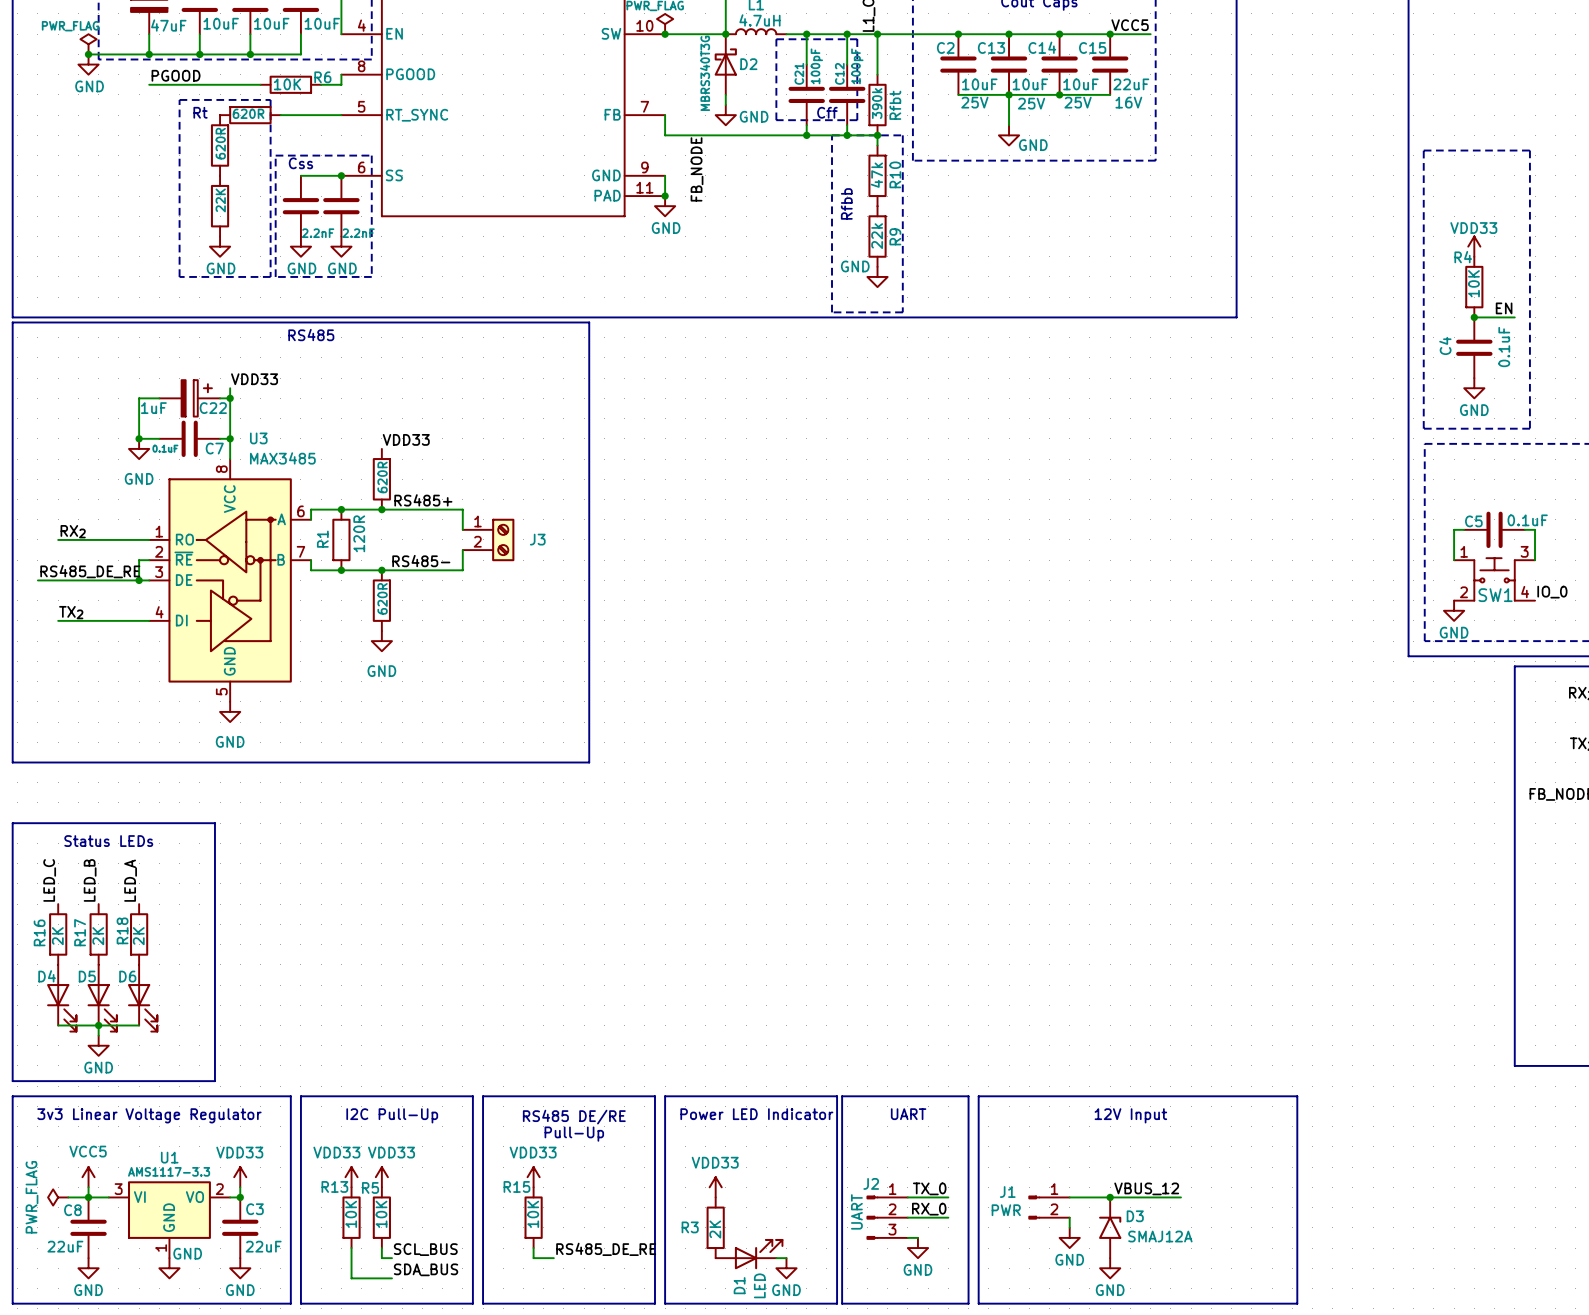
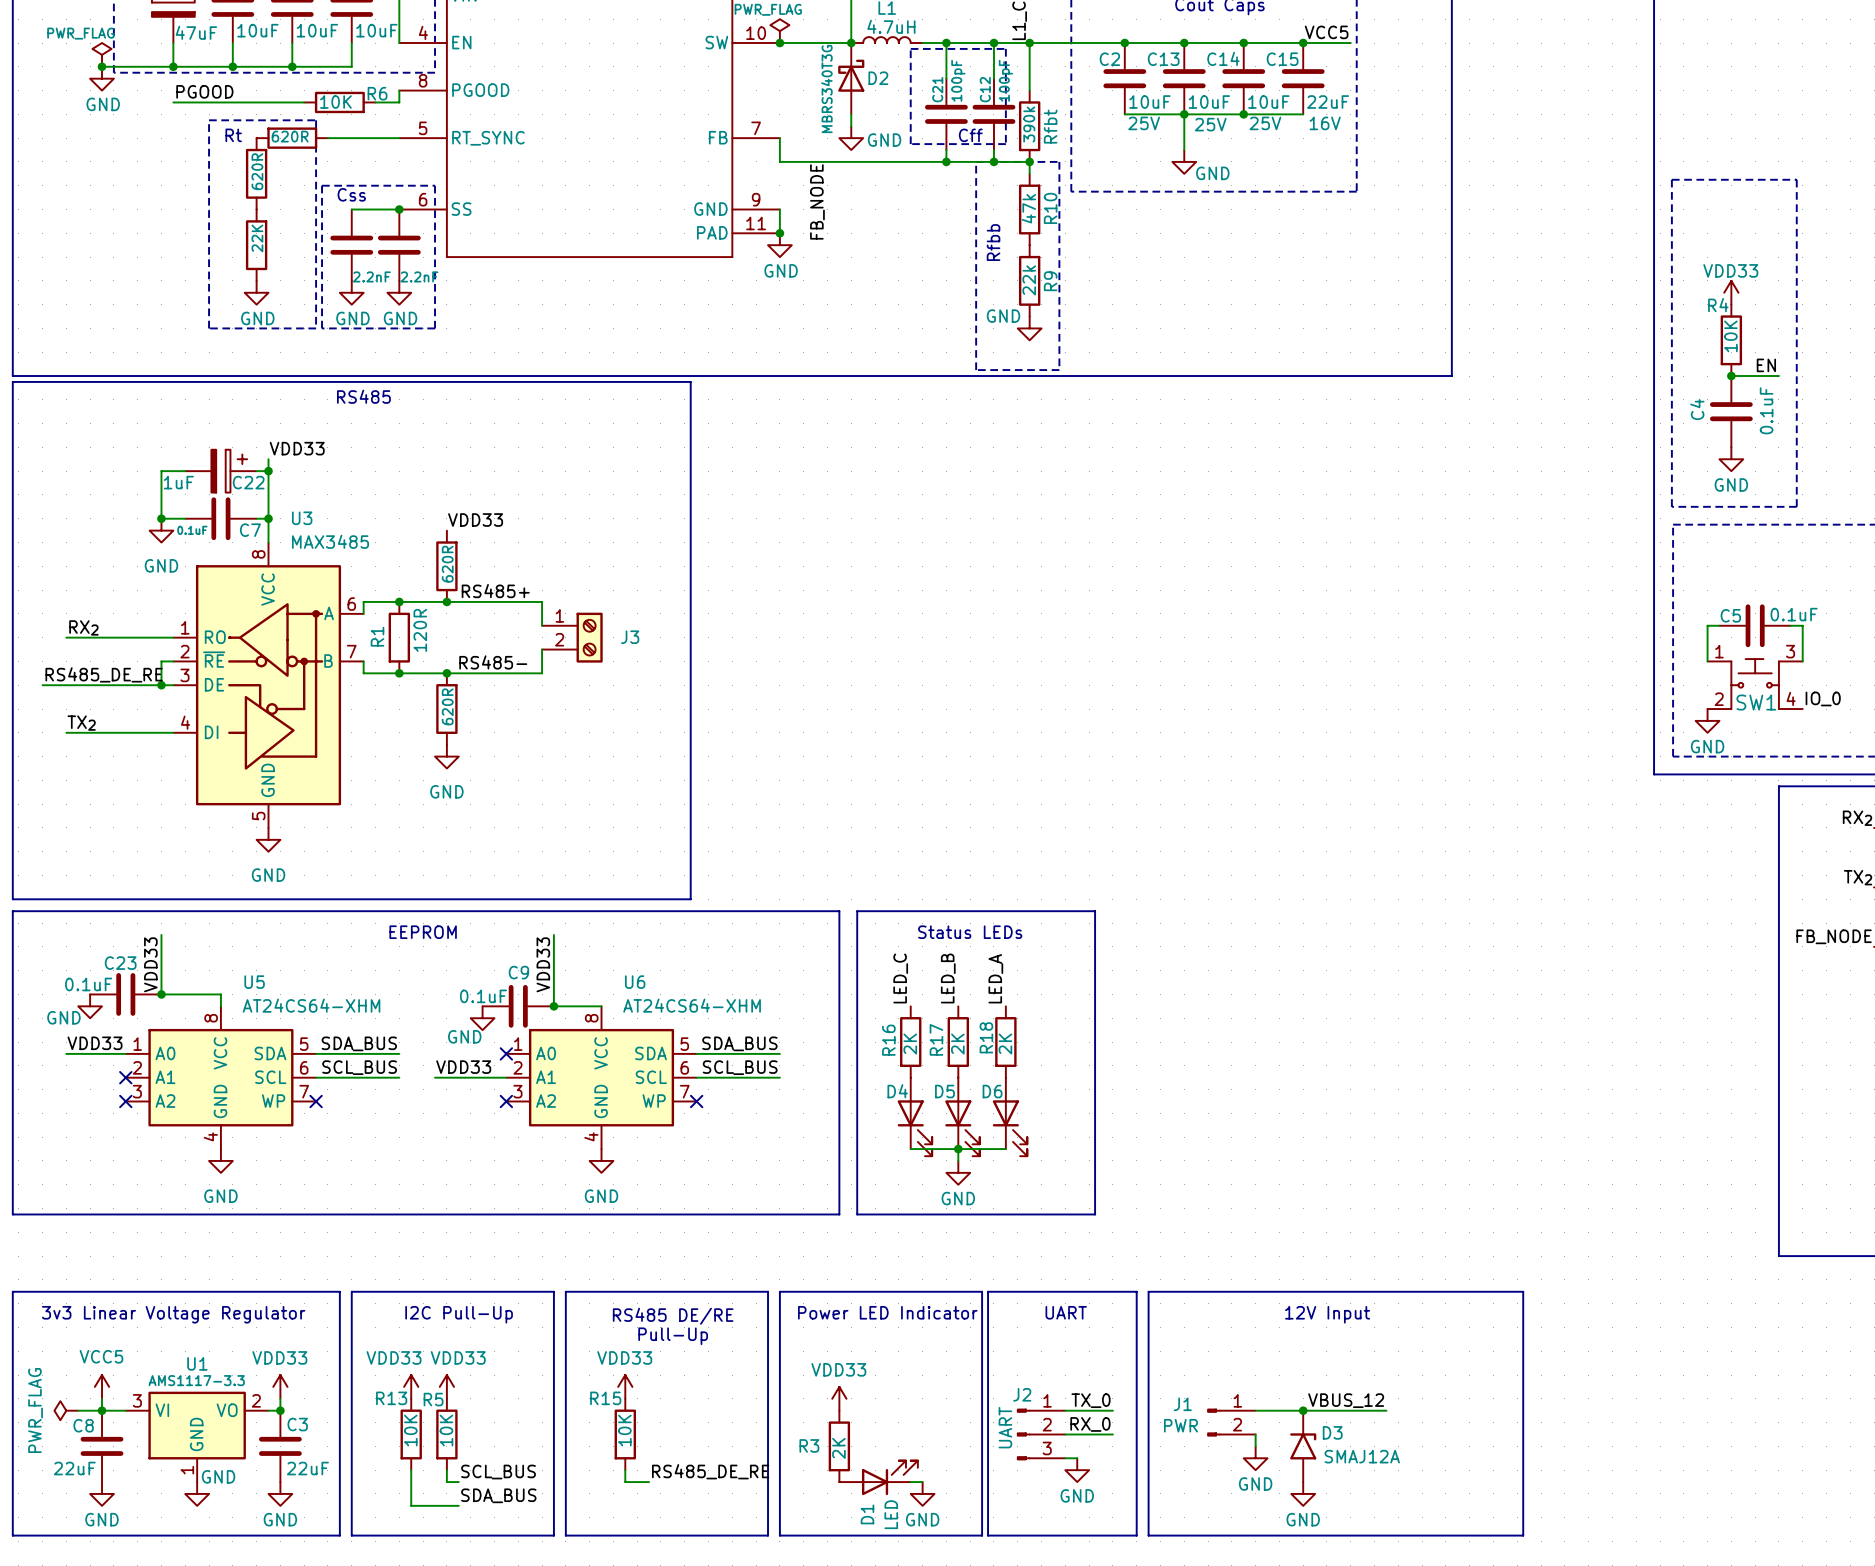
line: none -> (857, 911) (1095, 911) (1095, 1214) (857, 1214) (857, 911)
text: none -> EEPROM (423, 932)
text: none -> Status LEDs (970, 932)
wire: none -> (161, 934) (161, 994) (220, 994) (220, 1006)
wire: none -> (553, 934) (553, 1006) (601, 1006)
label: none -> VDD33 (150, 964)
label: none -> VDD33 (543, 964)
line: (12, 823) (214, 823) (214, 1081) (12, 1081) (12, 1030) -> (12, 970) (12, 911) (839, 911) (839, 1214) (12, 1214)
label: none -> LED_C (900, 978)
label: none -> LED_B (948, 978)
label: none -> LED_A (995, 978)
text: Status LEDs (108, 841) -> none
C23: none -> 0.1uF (125, 994)
junction: none -> (161, 994)
power symbol: none -> GND (90, 1006)
C9: none -> 0.1uF (518, 1006)
junction: none -> (553, 1006)
power symbol: none -> GND (482, 1018)
label: LED_C (49, 880) -> none
label: LED_B (90, 880) -> none
label: LED_A (130, 880) -> none
label: none -> VDD33 (95, 1043)
label: none -> SDA_BUS (359, 1043)
label: none -> SDA_BUS (739, 1043)
wire: none -> (66, 1053) (125, 1053)
wire: none -> (316, 1053) (399, 1053)
no-connect mark: none -> (506, 1053)
wire: none -> (696, 1053) (779, 1053)
label: none -> SCL_BUS (359, 1067)
label: none -> VDD33 (463, 1067)
label: none -> SCL_BUS (740, 1067)
no-connect mark: none -> (125, 1077)
U5: none -> AT24CS64-XHM (220, 1077)
wire: none -> (316, 1077) (399, 1077)
wire: none -> (435, 1077) (506, 1077)
U6: none -> AT24CS64-XHM (601, 1077)
wire: none -> (696, 1077) (779, 1077)
R16 position: (58, 934) -> (910, 1042)
R17 position: (98, 934) -> (958, 1042)
no-connect mark: none -> (125, 1101)
R18 position: (139, 934) -> (1005, 1042)
no-connect mark: none -> (316, 1101)
no-connect mark: none -> (506, 1101)
no-connect mark: none -> (696, 1101)
wire: none -> (910, 1149) (1005, 1149)
wire: none -> (958, 1149) (958, 1160)
junction: none -> (958, 1149)
power symbol: none -> GND (220, 1160)
power symbol: none -> GND (601, 1160)
power symbol: none -> GND (958, 1172)
D4 position: (61, 998) -> (914, 1116)
D5 position: (102, 998) -> (962, 1116)
D6 position: (142, 998) -> (1010, 1116)
wire: (58, 1025) (139, 1025) -> none
wire: (98, 1025) (98, 1035) -> none
junction: (98, 1025) -> none
power symbol: GND (98, 1045) -> none

